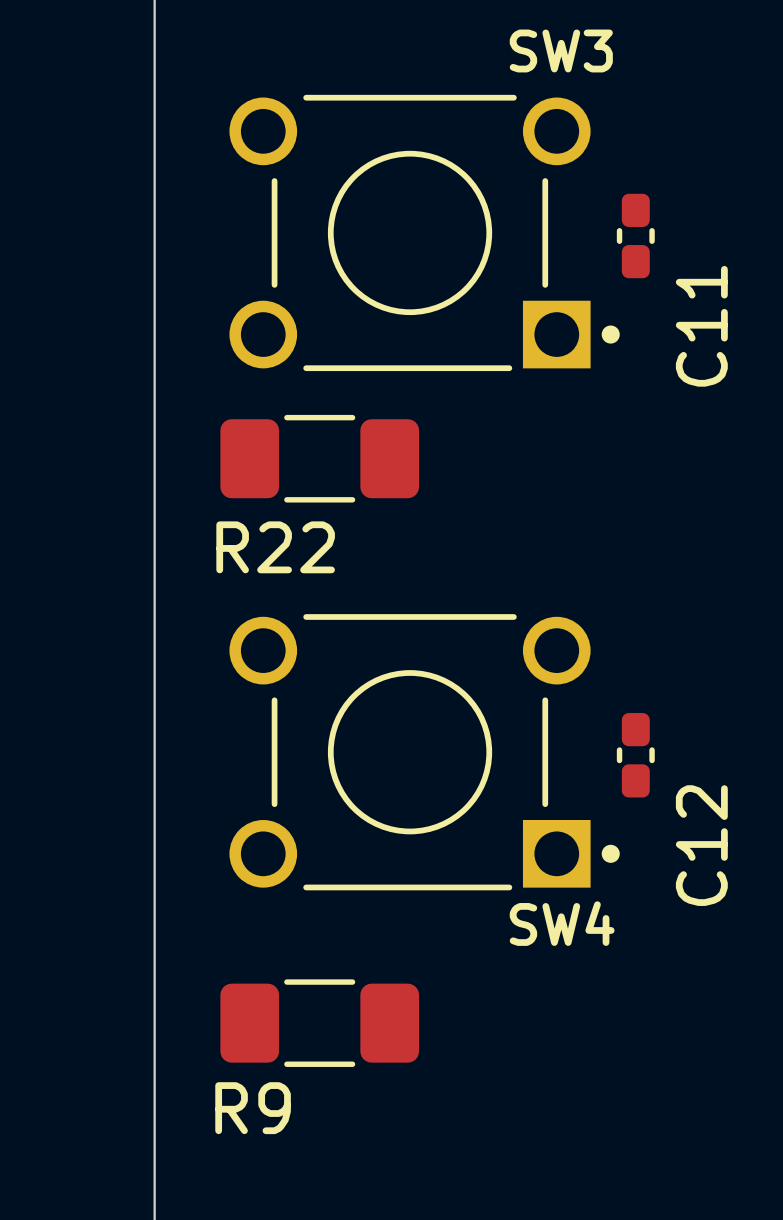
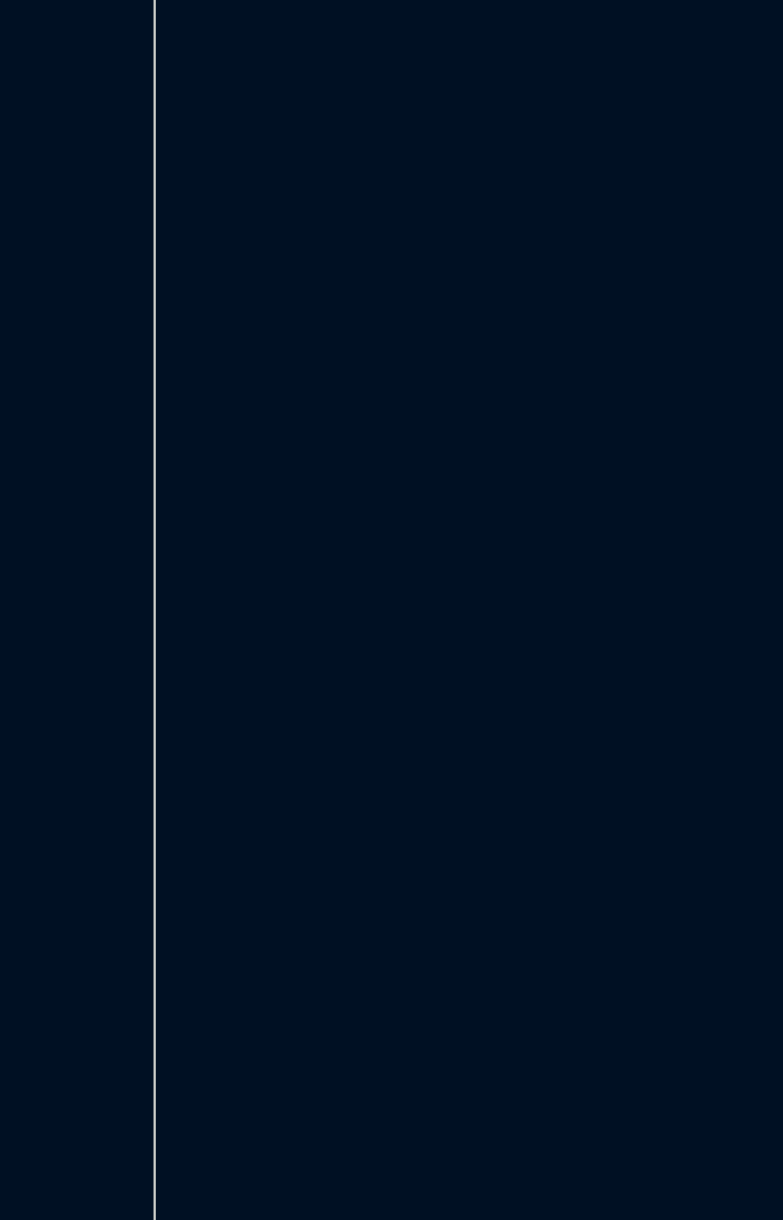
SW3: (424, 232) -> none
C11: (635, 236) -> none
R22: (319, 458) -> none
SW4: (424, 752) -> none
C12: (635, 755) -> none
R9: (319, 1023) -> none

